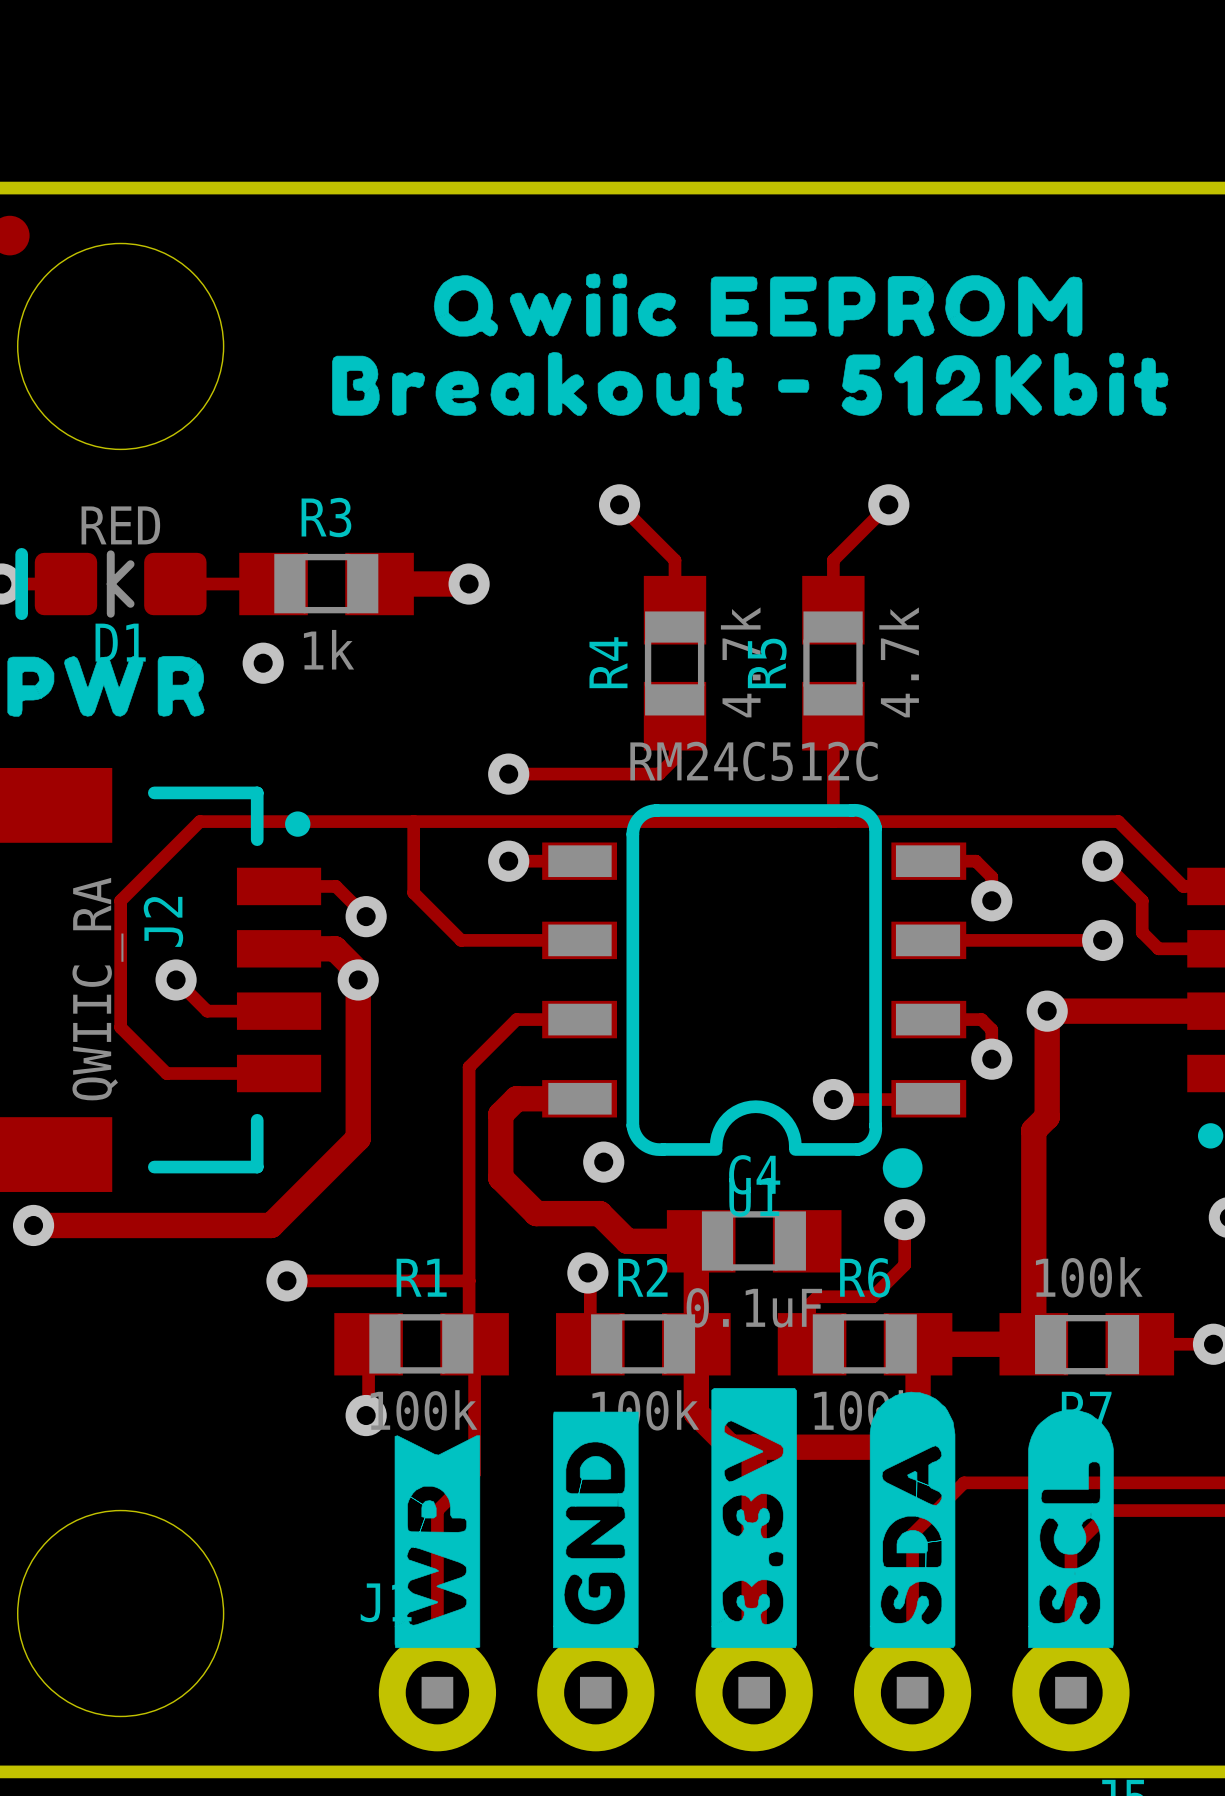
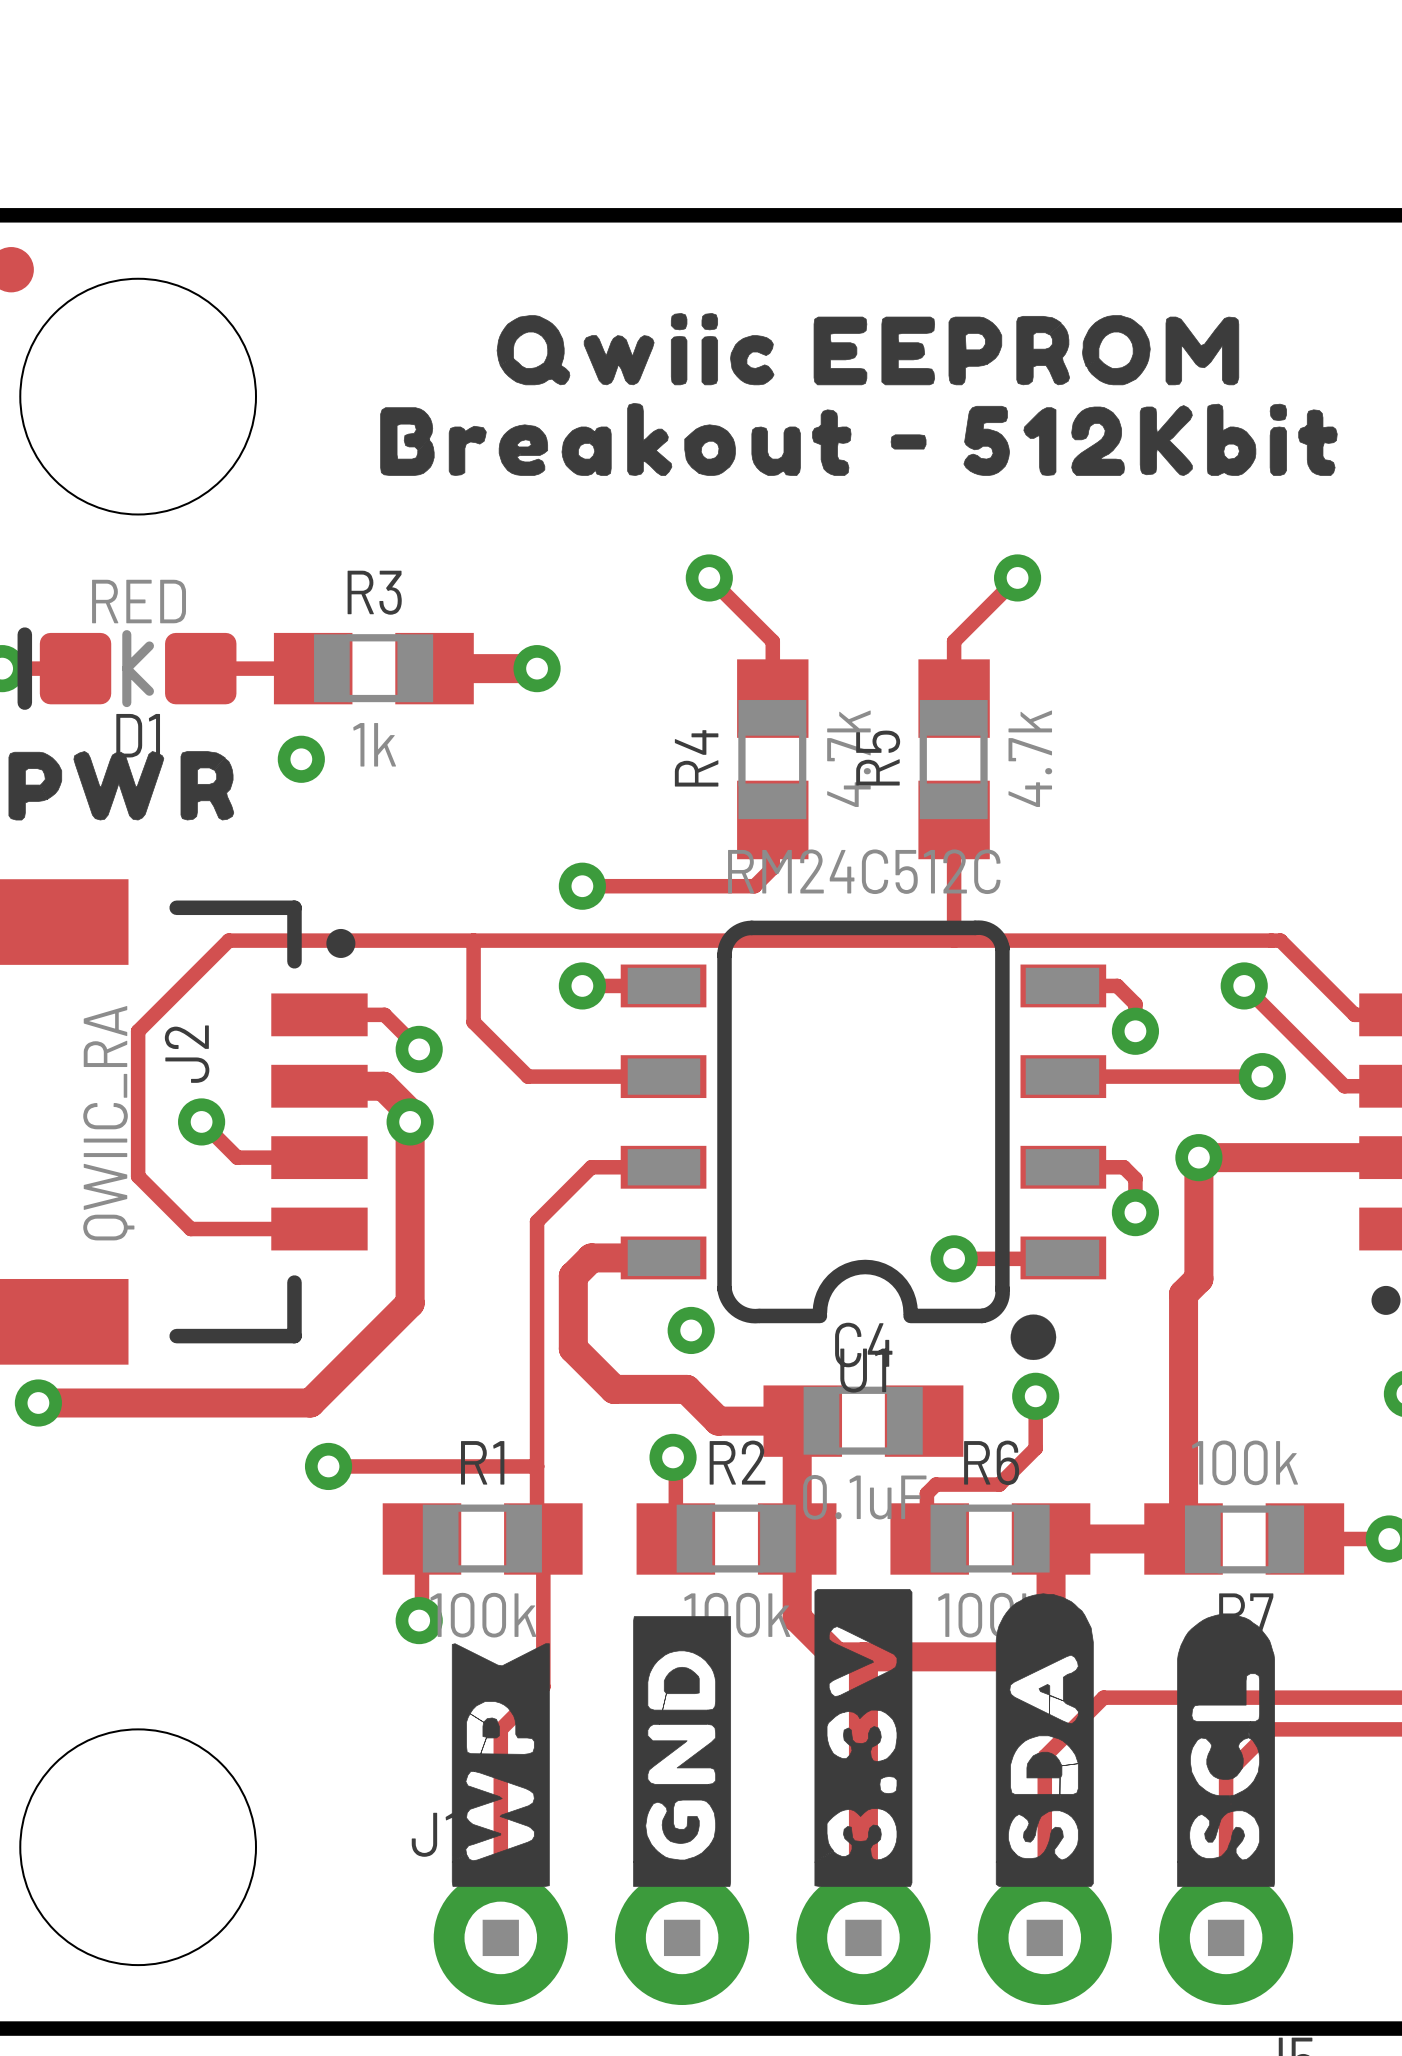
track: (1102, 861) (1142, 900) (1142, 932) (1158, 948) (1174, 948) -> (1244, 985) (1344, 1086)
via position: (1102, 861) -> (1244, 985)

